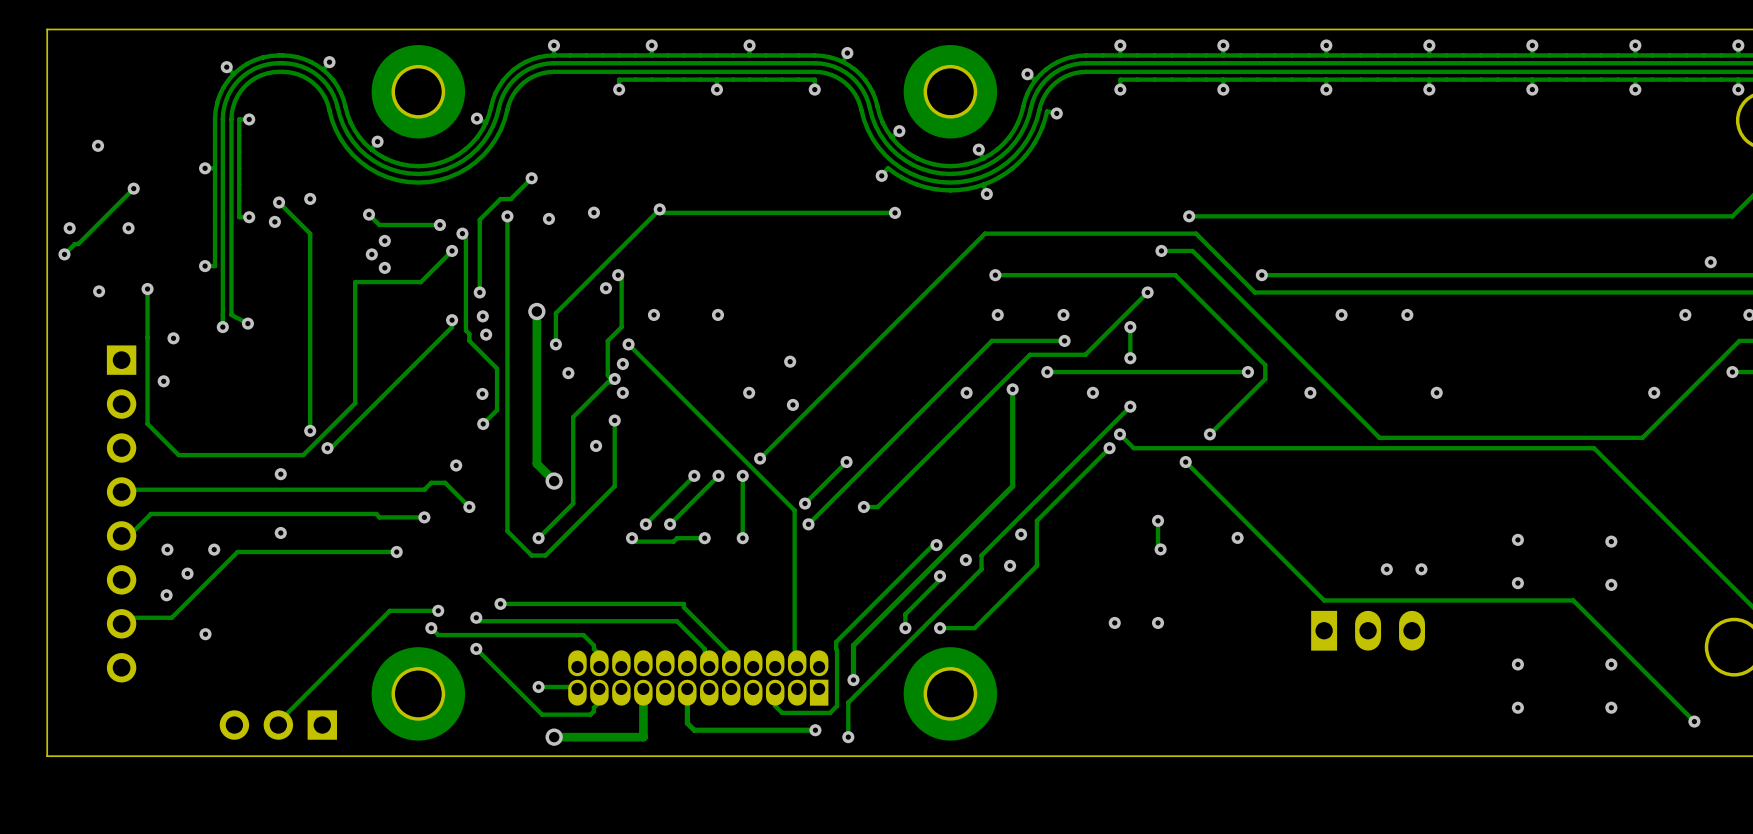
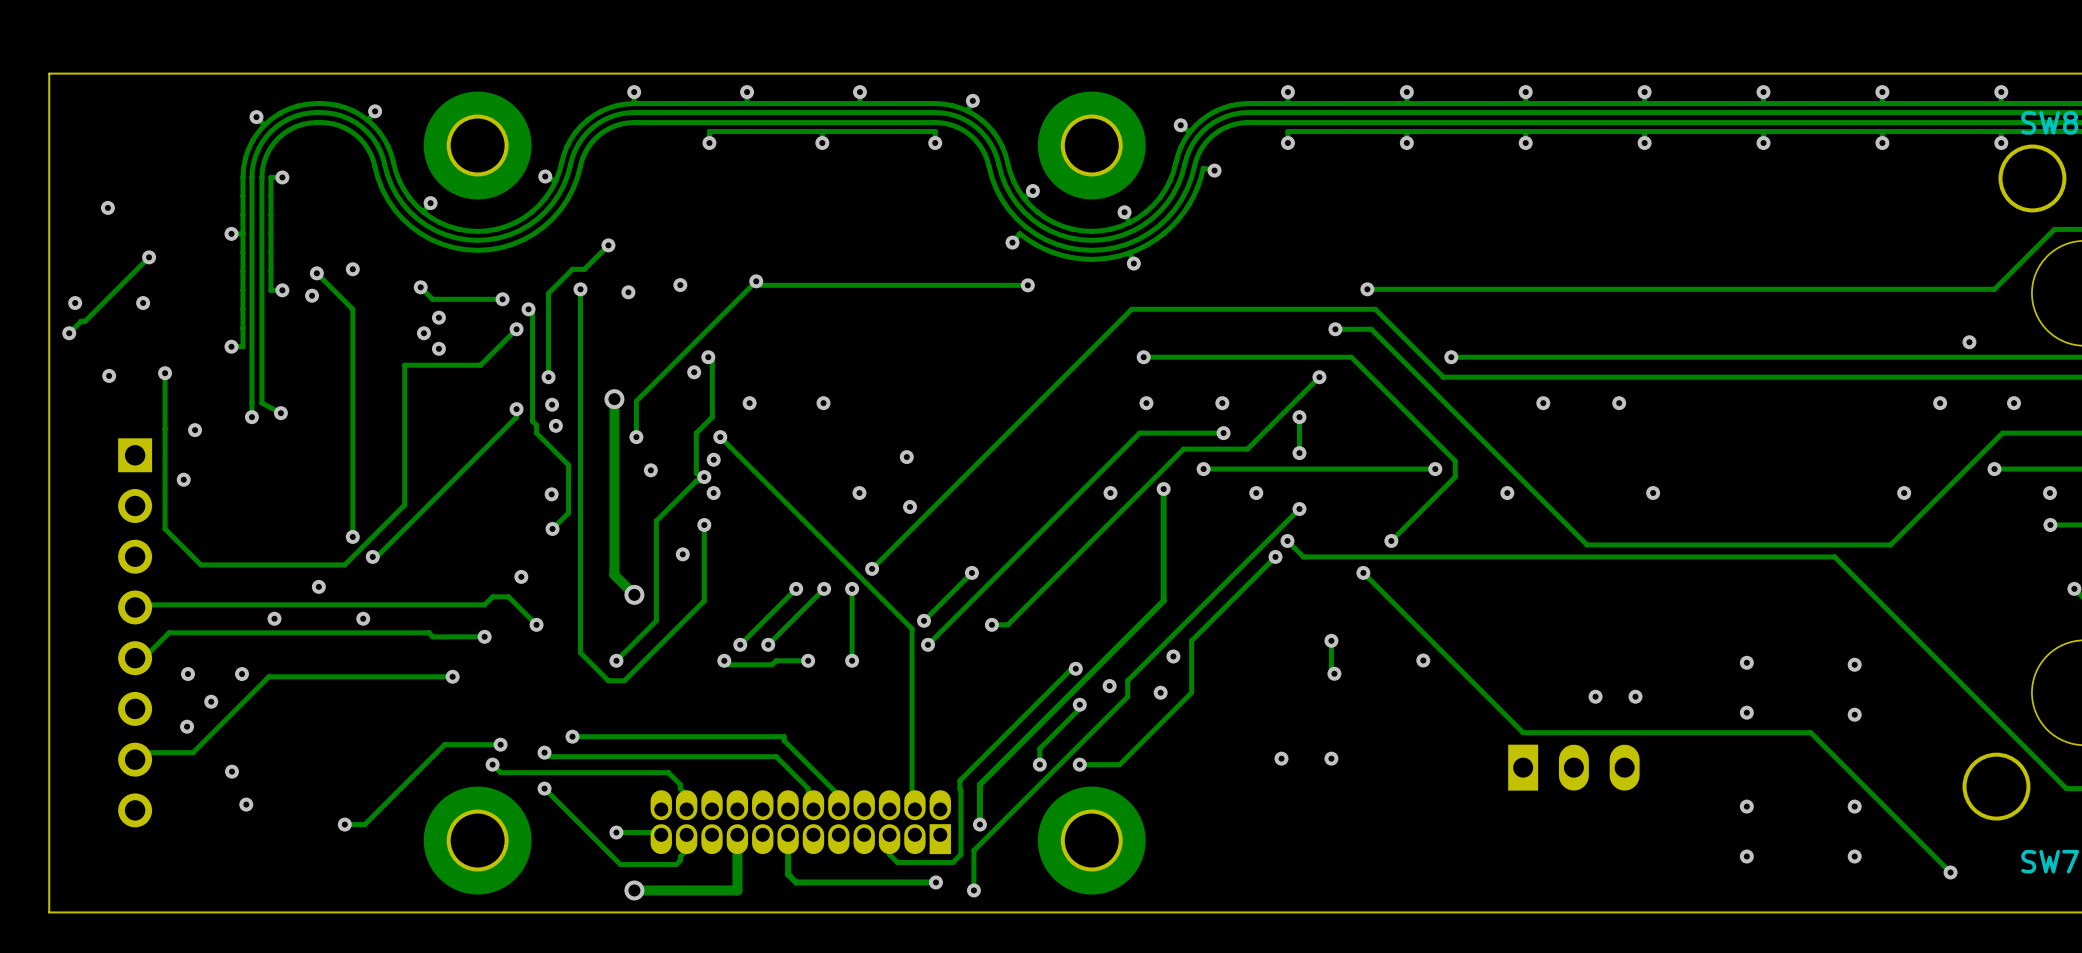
via: none -> (274, 618)
via: none -> (363, 618)
via: (280, 532) -> none
via: none -> (246, 804)
via: none -> (344, 824)
track: (320, 680) (285, 714) -> (364, 824) (344, 824)
part: (278, 725) -> none

